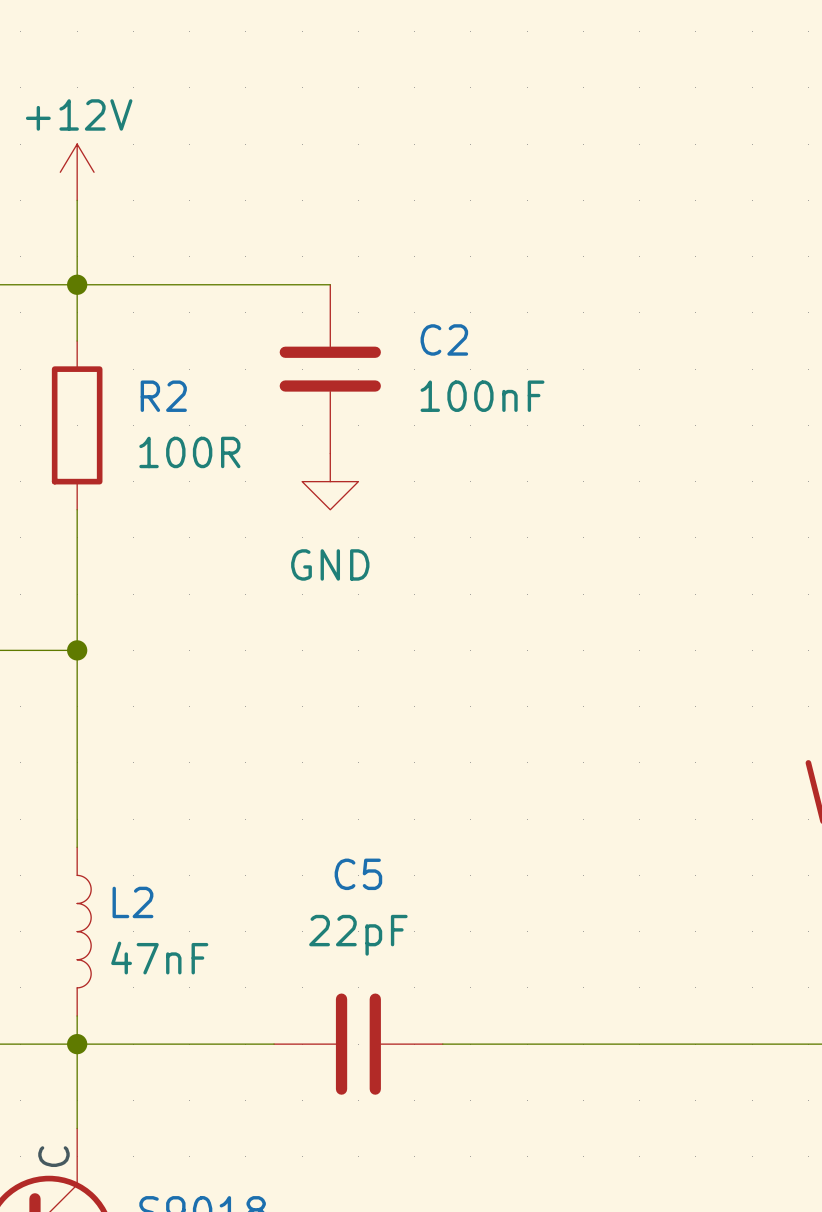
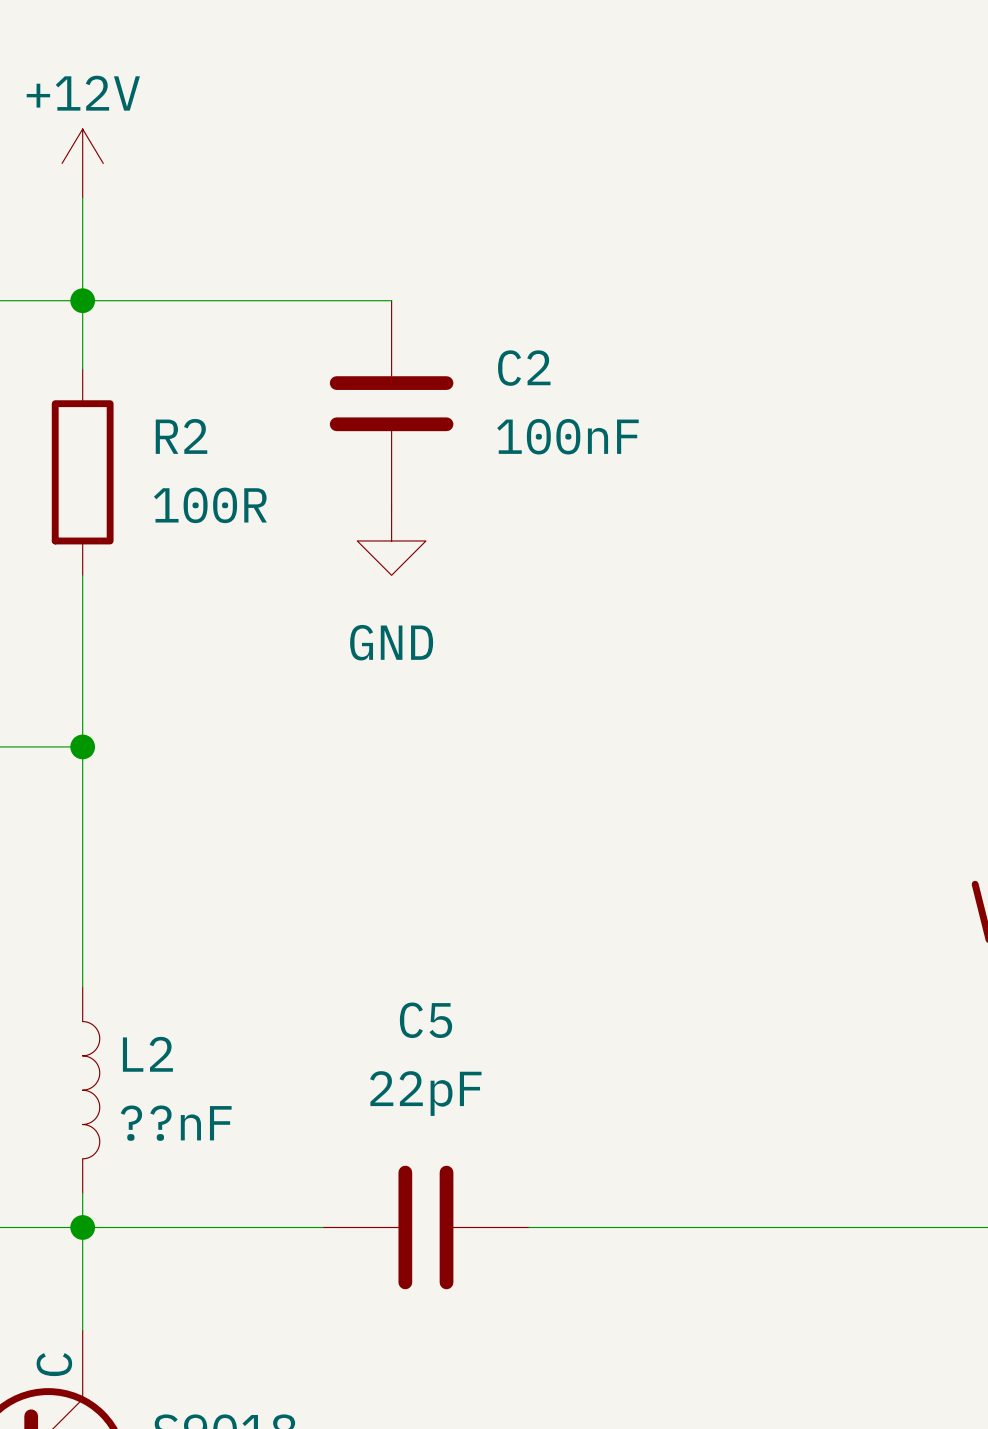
L2 value: 47nF (159, 958) -> ??nF (176, 1123)

